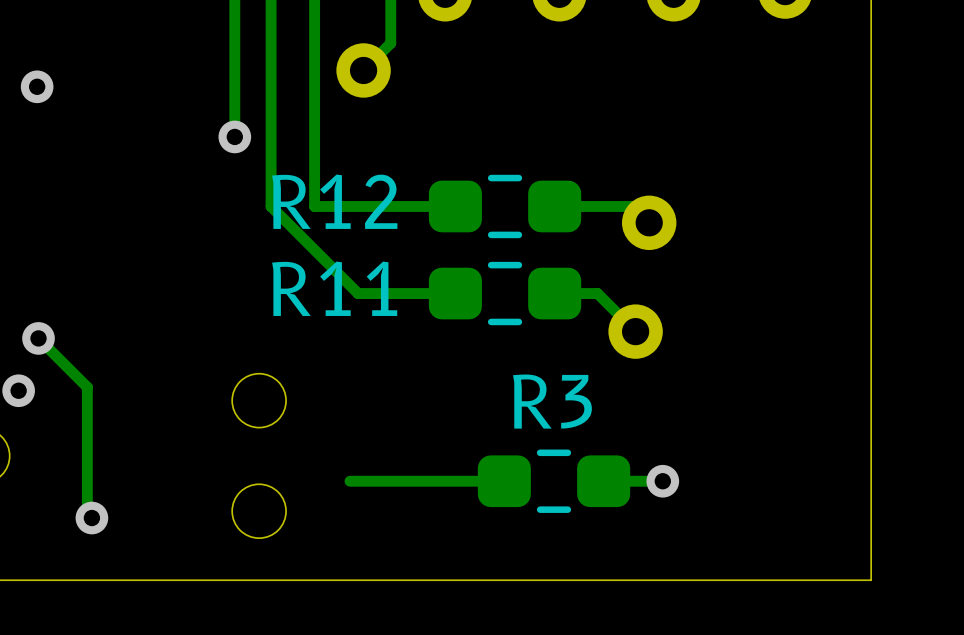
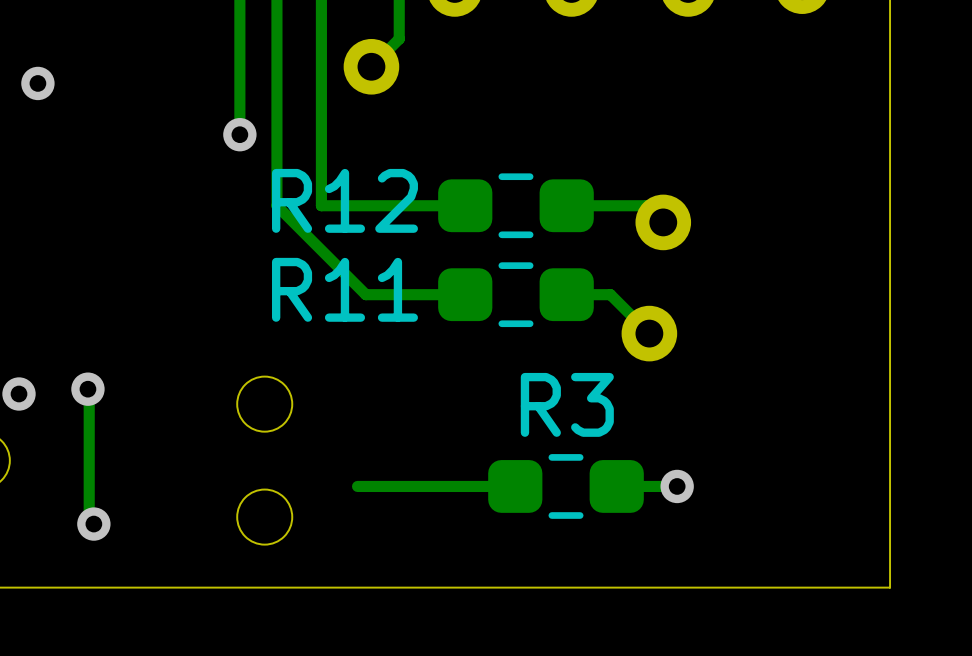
track: (38, 338) (86, 386) -> none
via position: (38, 338) -> (87, 389)

